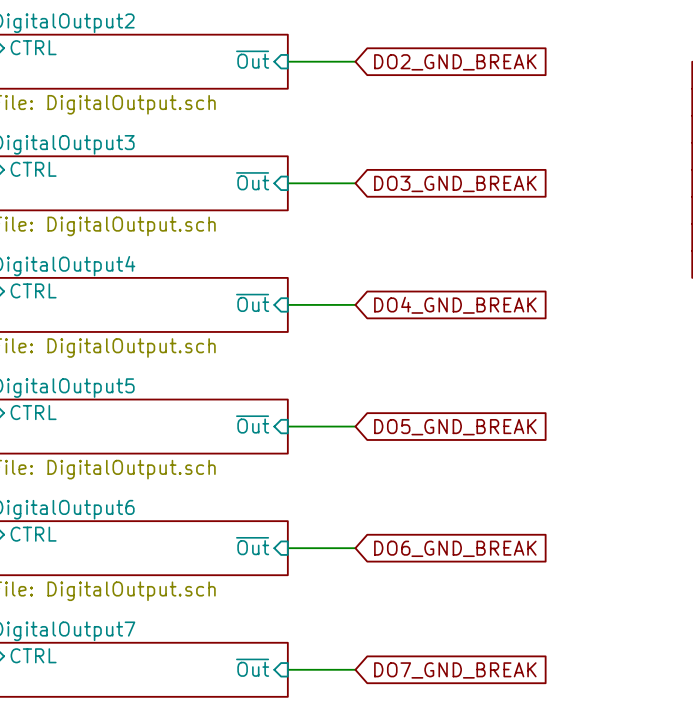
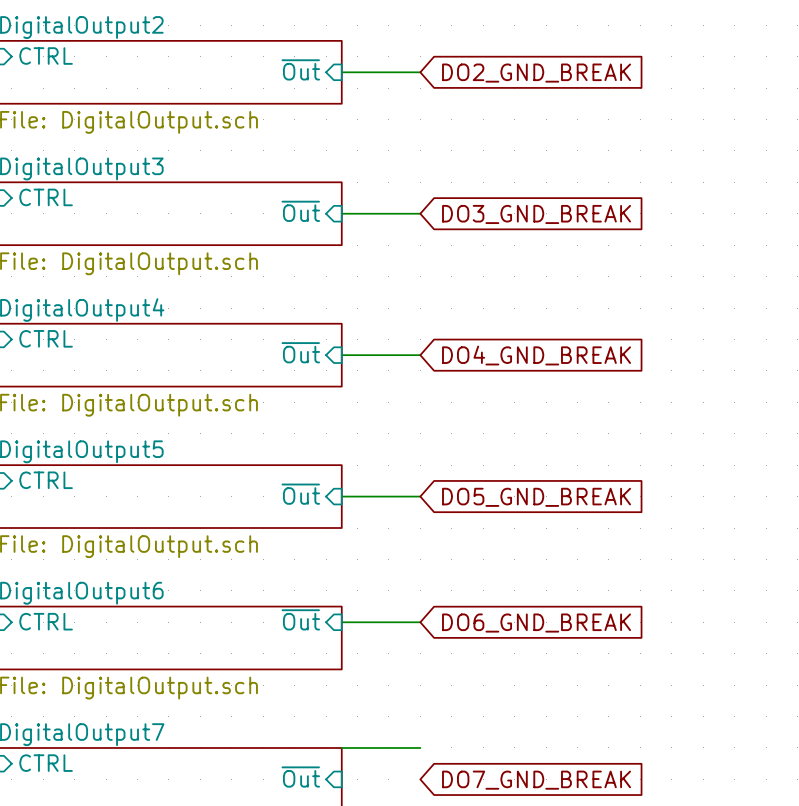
sheet pin position: ~{Out} (252, 546) -> ~{Out} (300, 619)
wire: (287, 548) (355, 548) -> (341, 622) (420, 622)
global label position: DO6_GND_BREAK (455, 548) -> DO6_GND_BREAK (536, 623)
wire: (287, 669) (355, 669) -> (341, 747) (420, 747)

